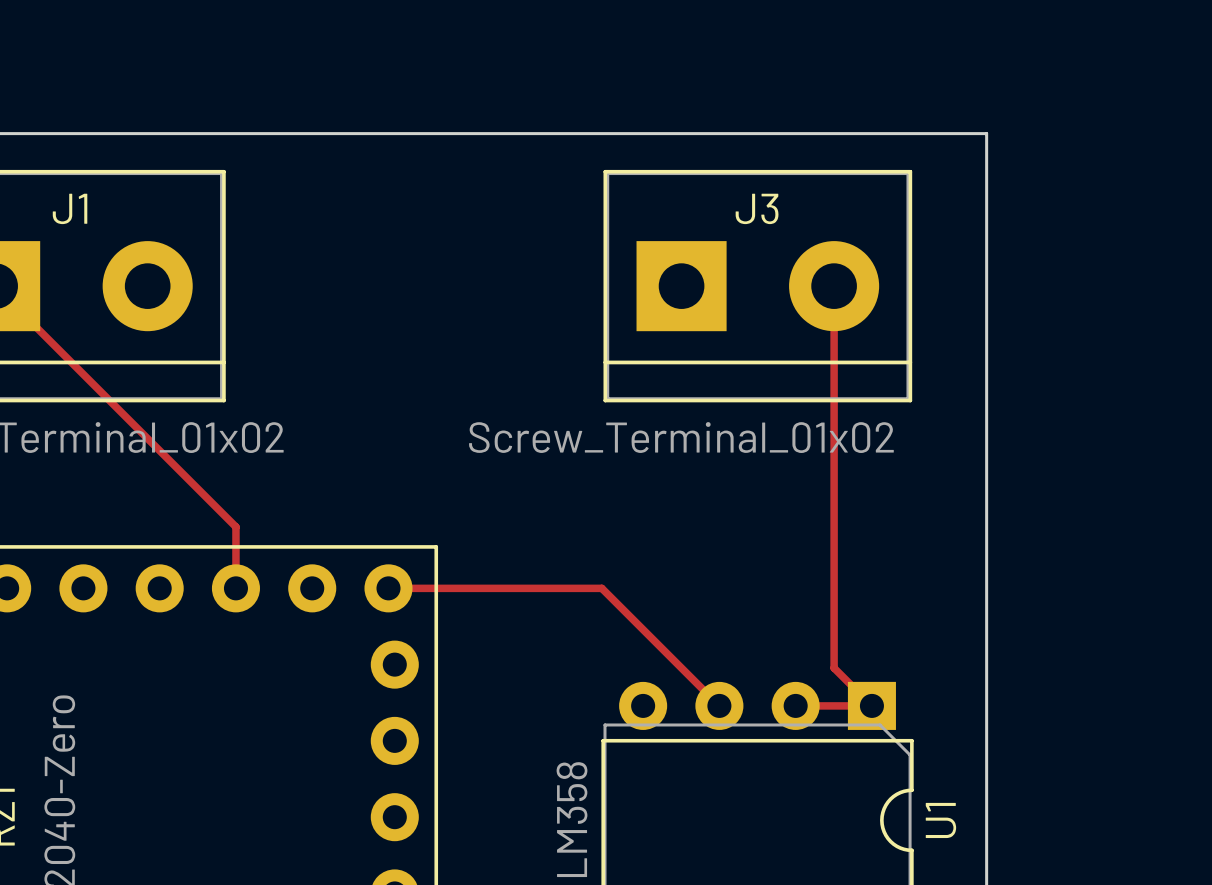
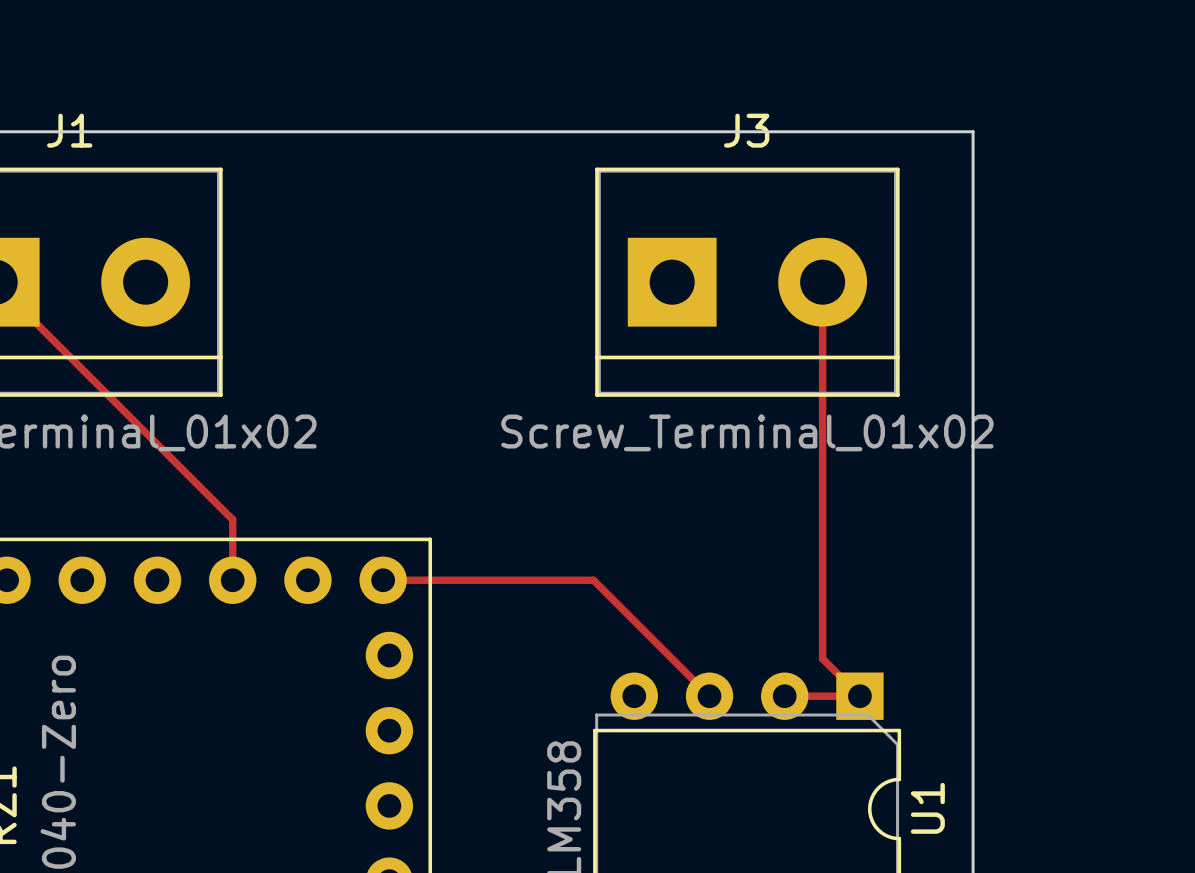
J1 name position: J1 (70, 208) -> J1 (69, 130)
J3 name position: J3 (757, 208) -> J3 (746, 130)
J3 value position: Screw_Terminal_01x02 (681, 437) -> Screw_Terminal_01x02 (747, 432)

